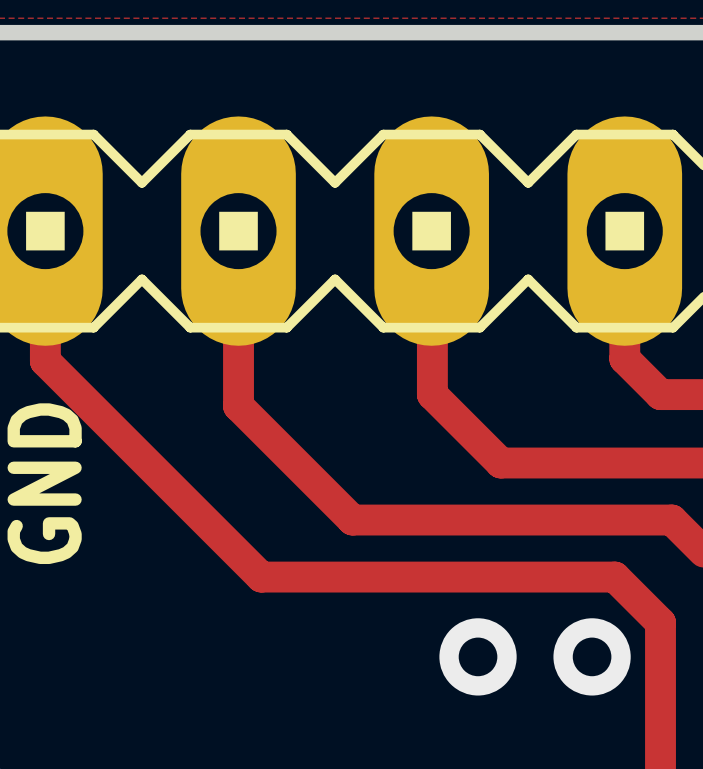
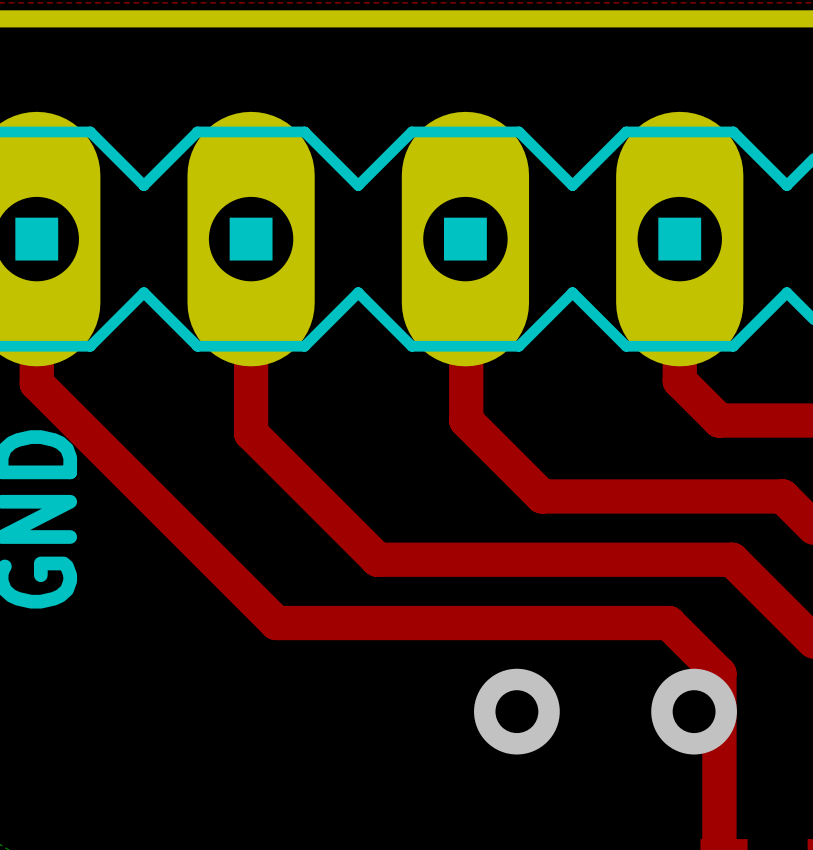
via position: (592, 656) -> (694, 711)

